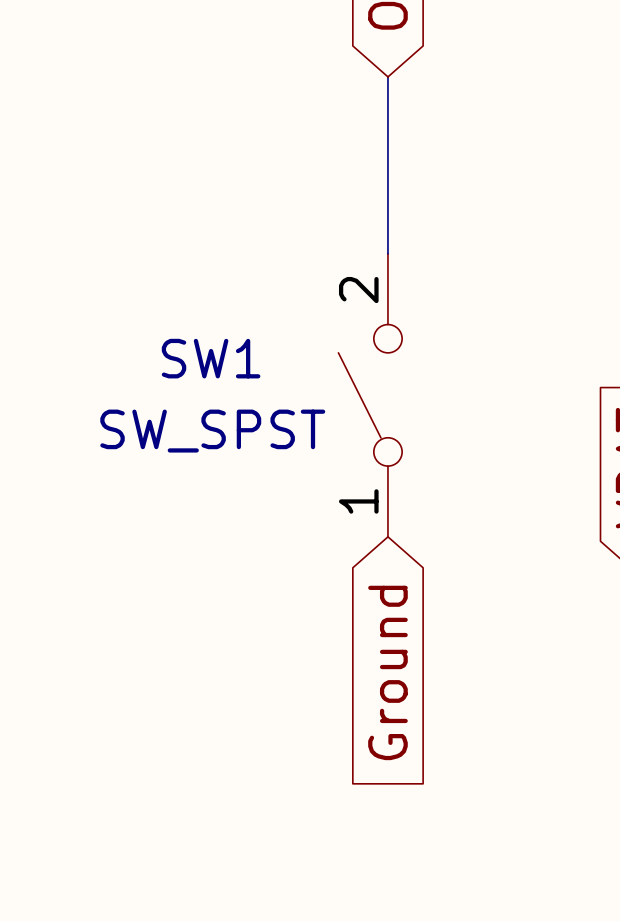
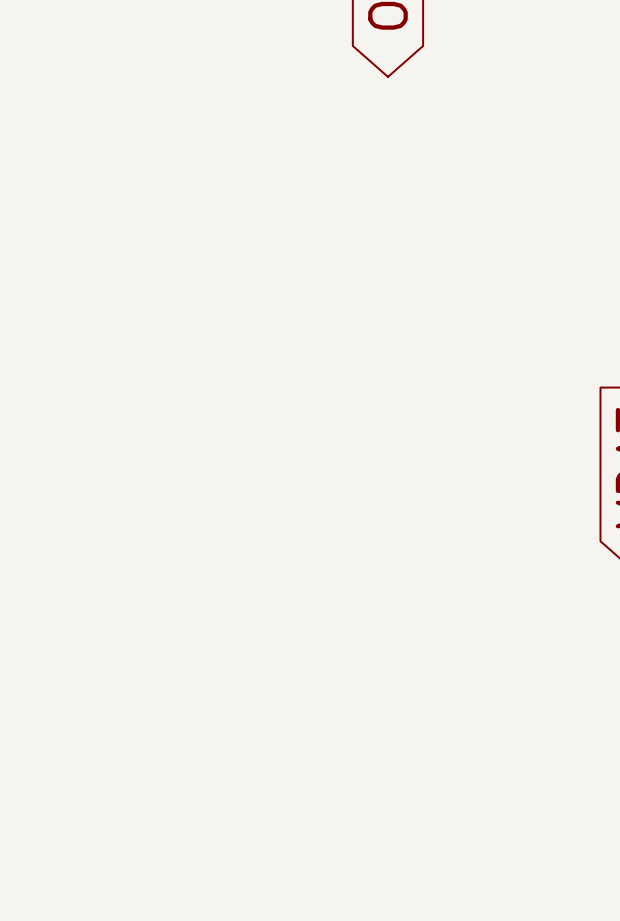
wire: (387, 76) (387, 253) -> none
SW1: SW_SPST (370, 395) -> none
global label: Ground (387, 672) -> none

